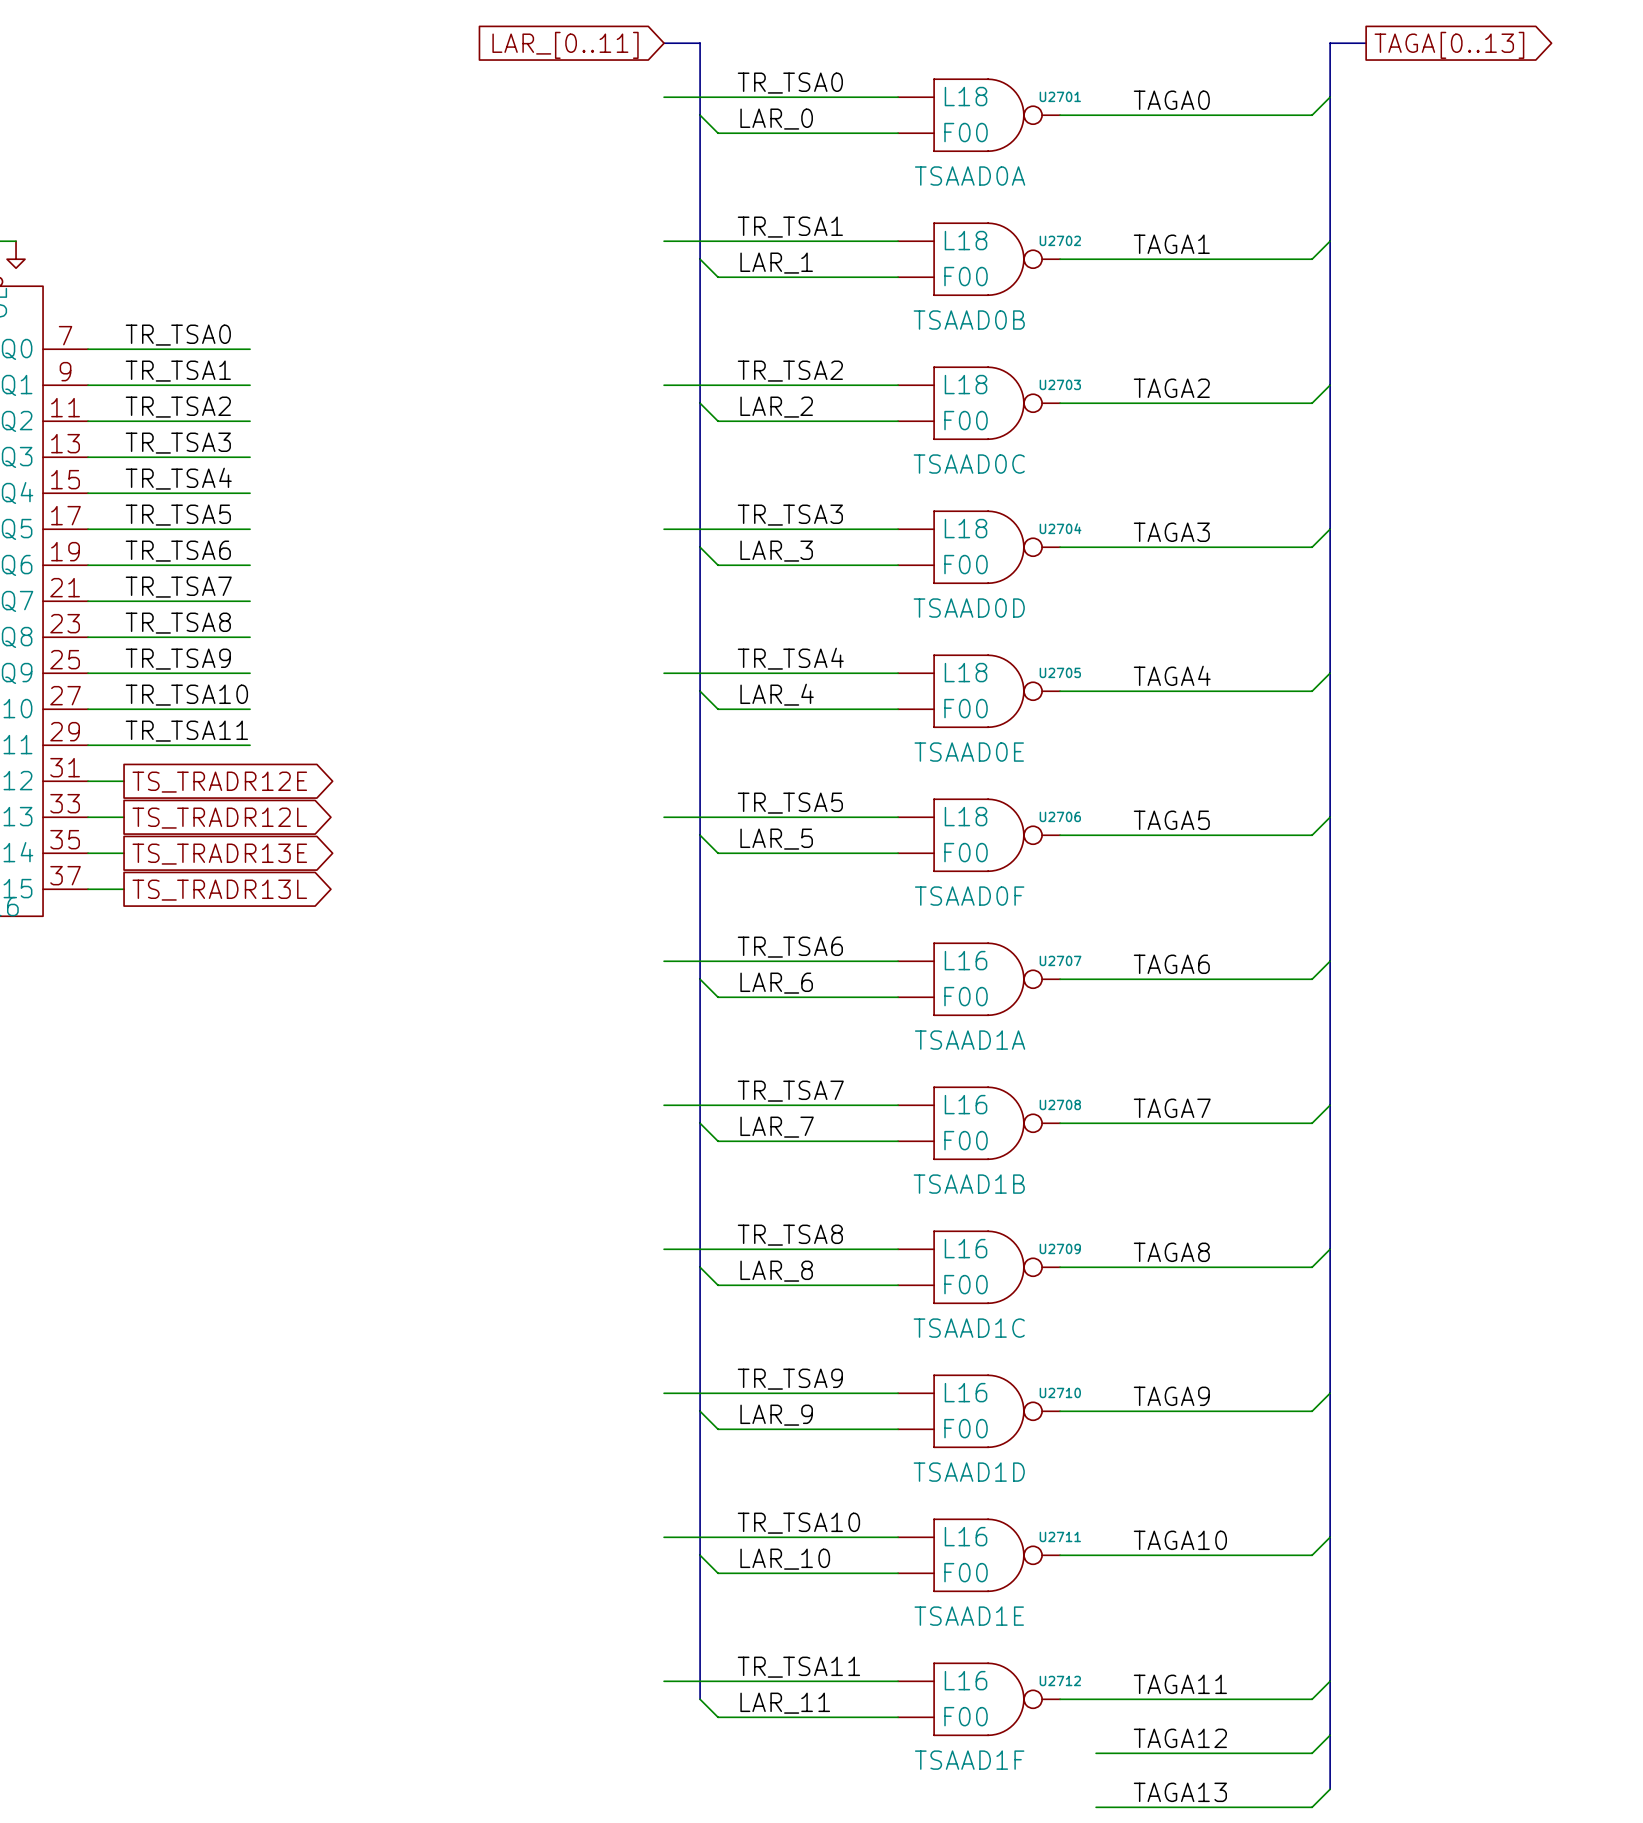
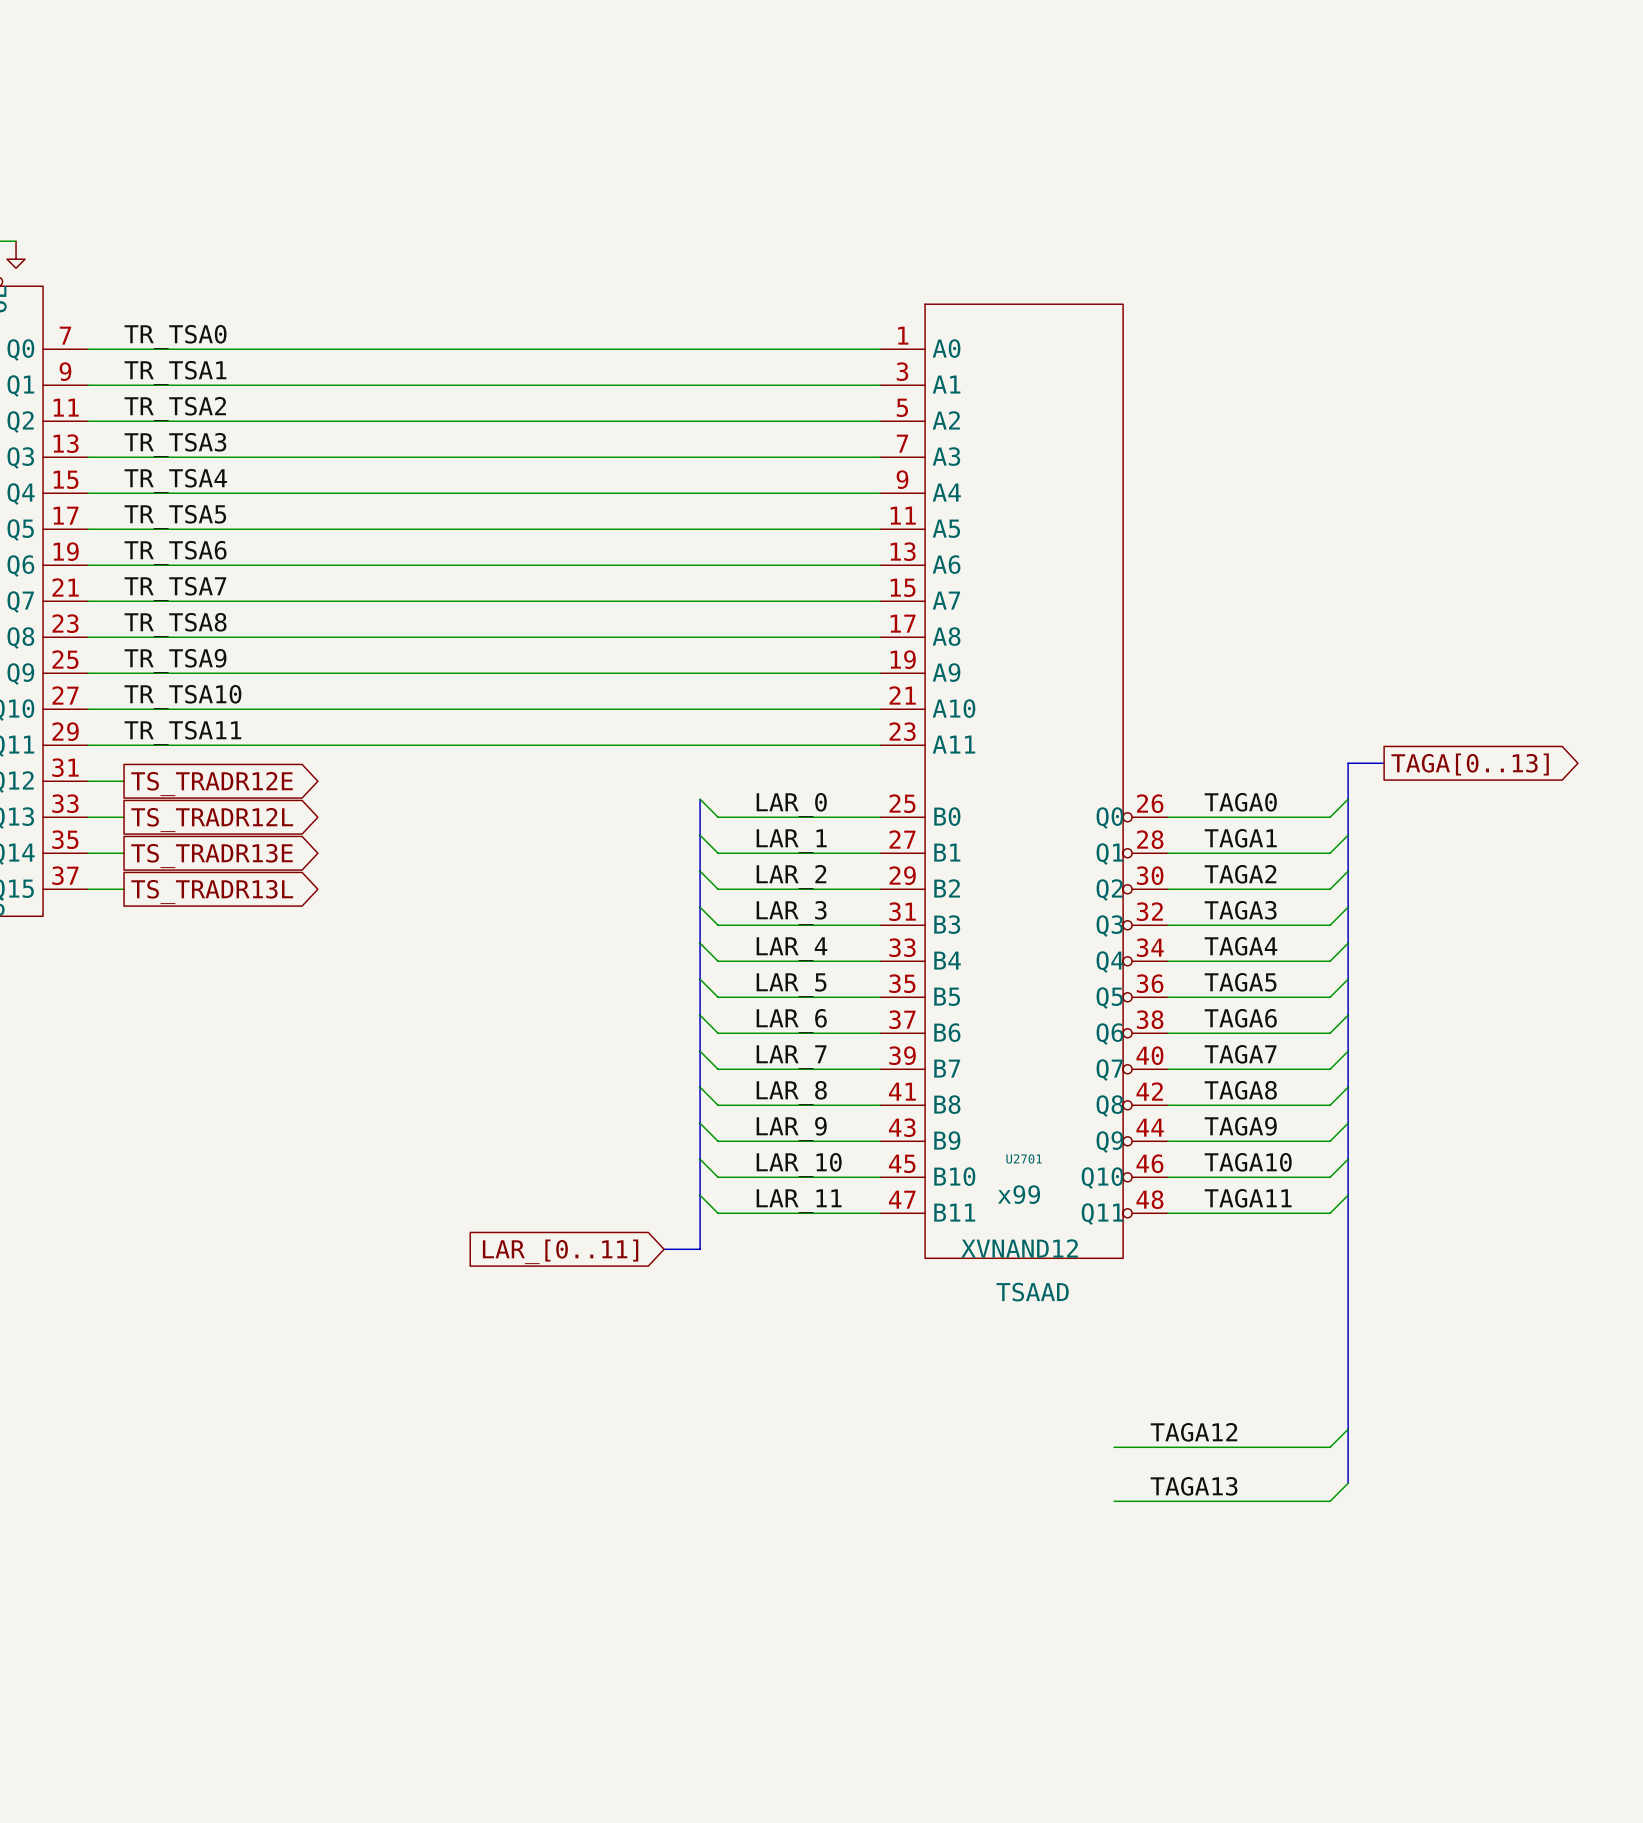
bus: (664, 43) (700, 43) (700, 799) -> none
bus: (1366, 43) (1330, 43) (1330, 1789) -> none
global label: LAR_[0..11] (565, 45) -> none
global label: TAGA[0..13] (1449, 45) -> none
U2701 symbol: [898, 78, 1061, 152] -> [880, 304, 1169, 1259]
label: TR_TSA0 (790, 83) -> none
U2701 text: L18 (966, 96) -> x99 (1019, 1194)
U2701 name position: U2701 (1060, 96) -> U2701 (1024, 1158)
wire: (664, 97) (898, 97) -> none
wire: (1330, 97) (1312, 115) (1060, 115) -> none
label: TAGA0 (1171, 100) -> none
wire: (700, 115) (718, 133) (898, 133) -> none
label: LAR_0 (776, 119) -> none
U2701 value: F00 (966, 132) -> XVNAND12 (1019, 1248)
U2701 text: TSAAD0A (970, 176) -> TSAAD (1032, 1292)
label: TR_TSA1 (790, 227) -> none
wire: (664, 241) (898, 241) -> none
wire: (1330, 241) (1312, 259) (1060, 259) -> none
label: TAGA1 (1171, 244) -> none
wire: (700, 259) (718, 277) (898, 277) -> none
U2702: F00 (979, 259) -> none
label: LAR_1 (776, 263) -> none
wire: none -> (250, 349) (880, 349)
label: TR_TSA2 (790, 371) -> none
wire: none -> (250, 385) (664, 385)
wire: (1330, 385) (1312, 403) (1060, 403) -> none
label: TAGA2 (1171, 388) -> none
wire: (700, 403) (718, 421) -> (250, 421) (718, 421)
U2703: F00 (979, 403) -> none
label: LAR_2 (776, 407) -> none
wire: none -> (250, 457) (880, 457)
wire: none -> (250, 493) (880, 493)
label: TR_TSA3 (790, 515) -> none
wire: none -> (250, 529) (664, 529)
wire: (1330, 529) (1312, 547) (1060, 547) -> none
label: TAGA3 (1171, 532) -> none
wire: (700, 547) (718, 565) -> (250, 565) (718, 565)
U2704: F00 (979, 547) -> none
label: LAR_3 (776, 551) -> none
wire: none -> (250, 601) (880, 601)
wire: none -> (250, 637) (880, 637)
label: TR_TSA4 (790, 658) -> none
wire: none -> (250, 673) (664, 673)
wire: (1330, 673) (1312, 691) (1060, 691) -> none
label: TAGA4 (1172, 675) -> none
wire: (700, 691) (718, 709) -> (250, 709) (718, 709)
U2705: F00 (979, 691) -> none
label: LAR_4 (777, 694) -> none
wire: none -> (250, 745) (880, 745)
bus: none -> (1384, 763) (1348, 763) (1348, 1483)
global label: none -> TAGA[0..13] (1470, 764)
wire: none -> (1348, 799) (1330, 817) (1168, 817)
label: none -> TAGA0 (1240, 802)
label: TR_TSA5 (790, 803) -> none
label: none -> LAR_0 (791, 805)
wire: (664, 817) (718, 817) -> (700, 799) (718, 817)
wire: (1330, 817) (1312, 835) (1060, 835) -> none
label: TAGA5 (1171, 820) -> none
U2706: F00 (979, 835) -> none
wire: none -> (1348, 835) (1330, 853) (1168, 853)
label: none -> TAGA1 (1240, 838)
label position: LAR_5 (776, 839) -> LAR_5 (791, 985)
label: none -> LAR_1 (791, 841)
wire: none -> (700, 871) (718, 889) (880, 889)
wire: none -> (1348, 871) (1330, 889) (1168, 889)
label: none -> TAGA2 (1240, 874)
label: none -> LAR_2 (791, 877)
wire: none -> (700, 907) (718, 925) (880, 925)
wire: none -> (1348, 907) (1330, 925) (1168, 925)
label: none -> TAGA3 (1240, 910)
label: none -> LAR_3 (791, 913)
wire: none -> (1348, 943) (1330, 961) (1168, 961)
label: none -> TAGA4 (1240, 946)
label: none -> LAR_4 (791, 949)
label: TR_TSA6 (790, 947) -> none
wire: (664, 961) (718, 961) -> (700, 943) (718, 961)
wire: (1330, 961) (1312, 979) (1060, 979) -> none
label position: TAGA6 (1171, 964) -> TAGA6 (1240, 1018)
U2707: F00 (979, 979) -> none
wire: none -> (1348, 979) (1330, 997) (1168, 997)
label: none -> TAGA5 (1240, 982)
label position: LAR_6 (776, 983) -> LAR_6 (791, 1021)
wire: none -> (700, 1015) (718, 1033) (880, 1033)
wire: none -> (1348, 1015) (1330, 1033) (1168, 1033)
wire: none -> (700, 1051) (718, 1069) (880, 1069)
wire: none -> (1348, 1051) (1330, 1069) (1168, 1069)
wire: none -> (1348, 1087) (1330, 1105) (1168, 1105)
label: none -> TAGA8 (1240, 1090)
label: TR_TSA7 (790, 1091) -> none
label: none -> LAR_8 (791, 1093)
wire: (664, 1105) (718, 1105) -> (700, 1087) (718, 1105)
wire: (1330, 1105) (1312, 1123) (1060, 1123) -> none
label position: TAGA7 (1172, 1108) -> TAGA7 (1240, 1054)
U2708: F00 (979, 1123) -> none
wire: none -> (1348, 1123) (1330, 1141) (1168, 1141)
label: none -> TAGA9 (1240, 1126)
label position: LAR_7 (777, 1127) -> LAR_7 (791, 1057)
label: none -> LAR_9 (791, 1129)
wire: none -> (700, 1159) (718, 1177) (880, 1177)
wire: none -> (1348, 1159) (1330, 1177) (1168, 1177)
label: none -> TAGA10 (1248, 1162)
label: none -> LAR_10 (799, 1165)
wire: none -> (700, 1195) (718, 1213) (880, 1213)
wire: none -> (1348, 1195) (1330, 1213) (1168, 1213)
label: none -> TAGA11 (1248, 1198)
label: none -> LAR_11 (799, 1201)
label: TR_TSA8 (790, 1235) -> none
wire: (664, 1249) (898, 1249) -> none
bus: (700, 1249) (700, 1699) -> (700, 1249) (664, 1249)
wire: (1330, 1249) (1312, 1267) (1060, 1267) -> none
global label: none -> LAR_[0..11] (560, 1251)
label: TAGA8 (1171, 1252) -> none
wire: (700, 1267) (718, 1285) (898, 1285) -> none
U2709: F00 (979, 1267) -> none
label: LAR_8 (776, 1271) -> none
label: TR_TSA9 (790, 1379) -> none
wire: (664, 1393) (898, 1393) -> none
wire: (1330, 1393) (1312, 1411) (1060, 1411) -> none
label: TAGA9 (1171, 1396) -> TAGA12 (1193, 1432)
wire: (700, 1411) (718, 1429) (898, 1429) -> none
U2710: F00 (979, 1411) -> none
label: LAR_9 (776, 1415) -> none
wire: none -> (1348, 1429) (1330, 1447) (1114, 1447)
wire: none -> (1348, 1483) (1330, 1501) (1114, 1501)
label: none -> TAGA13 (1194, 1486)
label: TR_TSA10 (798, 1523) -> none
wire: (664, 1537) (898, 1537) -> none
wire: (1330, 1537) (1312, 1555) (1060, 1555) -> none
label: TAGA10 (1180, 1540) -> none
wire: (700, 1555) (718, 1573) (898, 1573) -> none
U2711: F00 (979, 1555) -> none
label: LAR_10 (785, 1559) -> none
label: TR_TSA11 (798, 1667) -> none
wire: (664, 1681) (898, 1681) -> none
wire: (1330, 1681) (1312, 1699) (1060, 1699) -> none
label: TAGA11 (1180, 1684) -> none
wire: (700, 1699) (718, 1717) (898, 1717) -> none
U2712: F00 (979, 1699) -> none
label: LAR_11 (785, 1703) -> none
wire: (1330, 1735) (1312, 1753) (1096, 1753) -> none
label: TAGA12 (1180, 1738) -> none
wire: (1330, 1789) (1312, 1807) (1096, 1807) -> none
label: TAGA13 (1180, 1792) -> none

